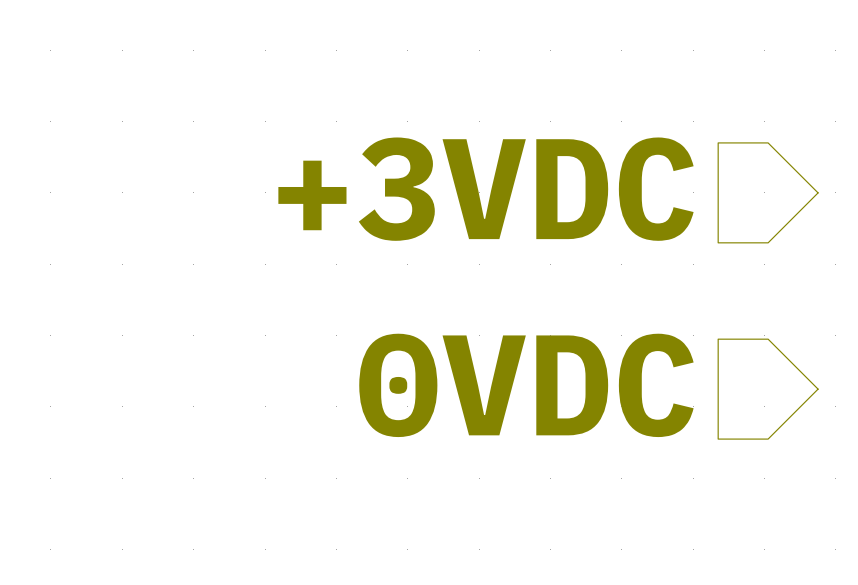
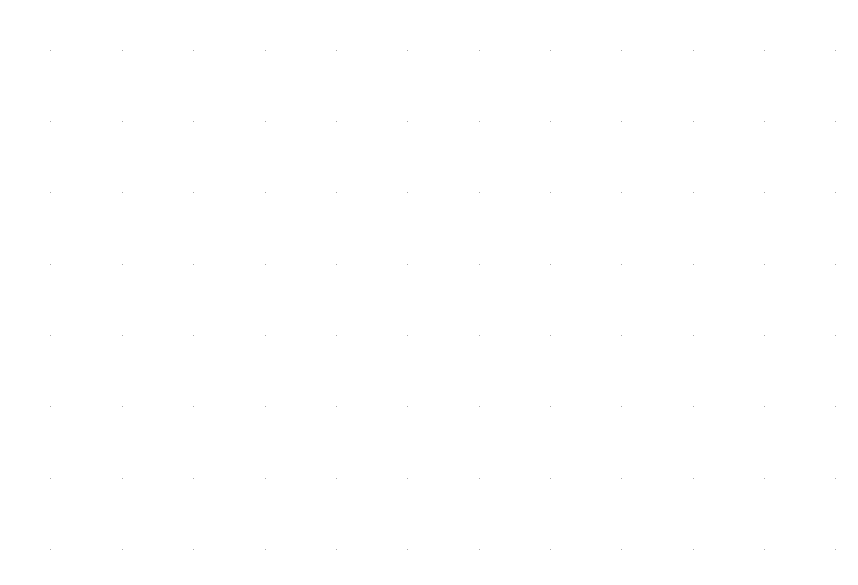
hierarchical label: +3VDC (485, 189) -> none
hierarchical label: 0VDC (526, 385) -> none

